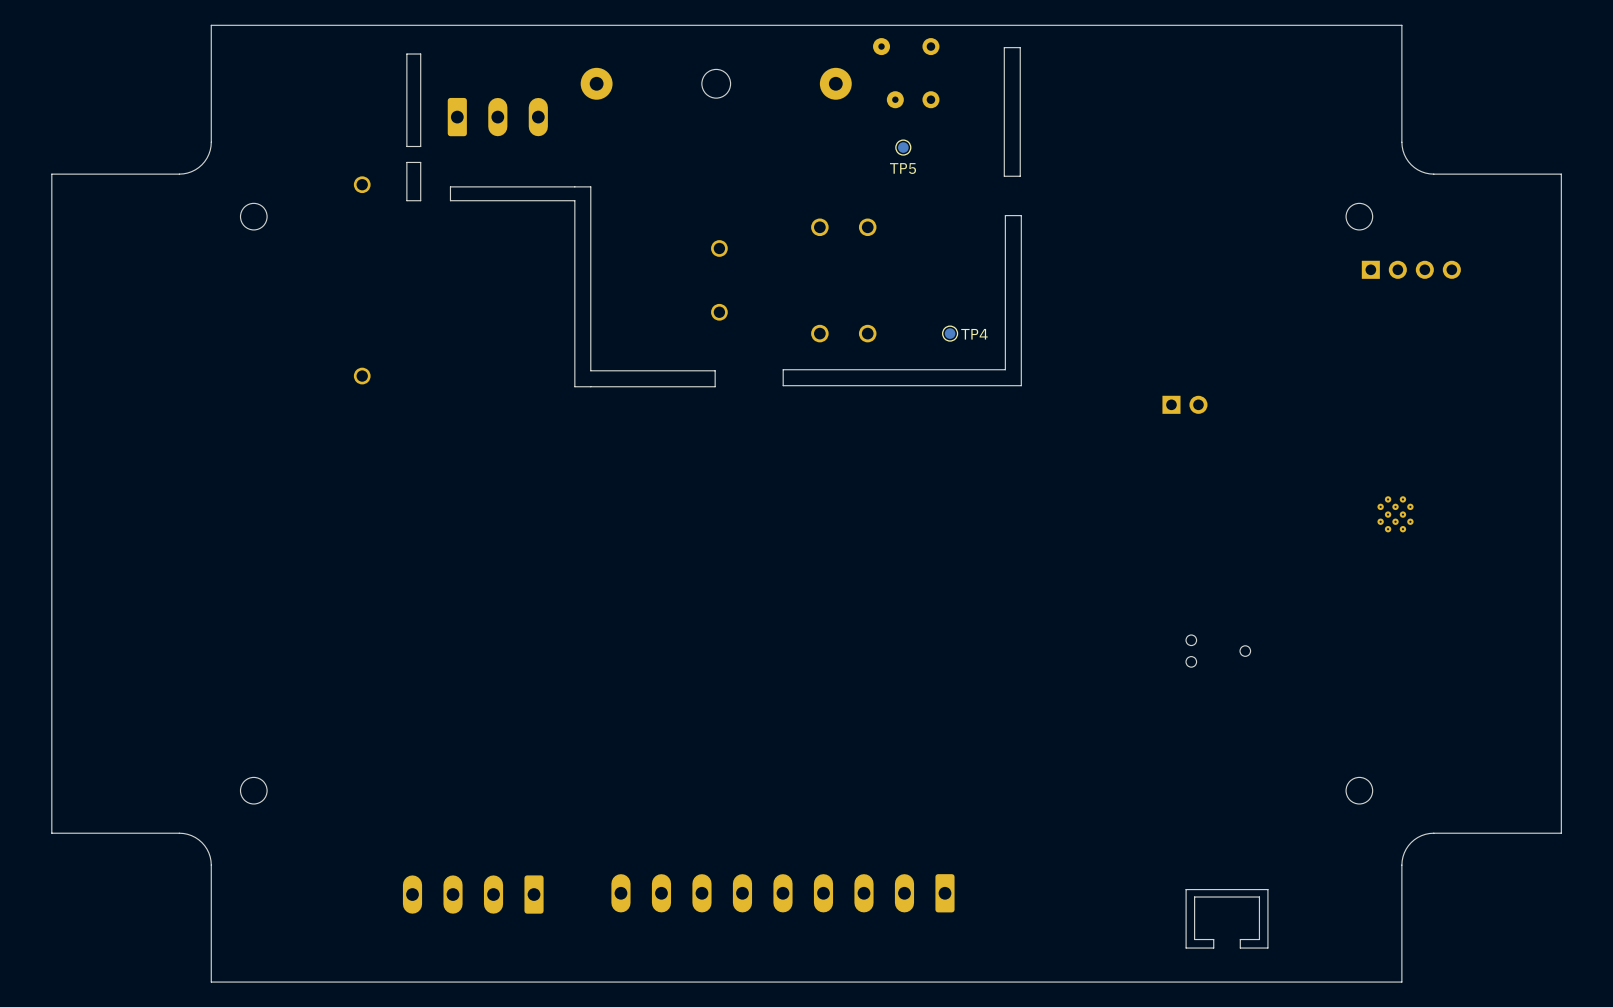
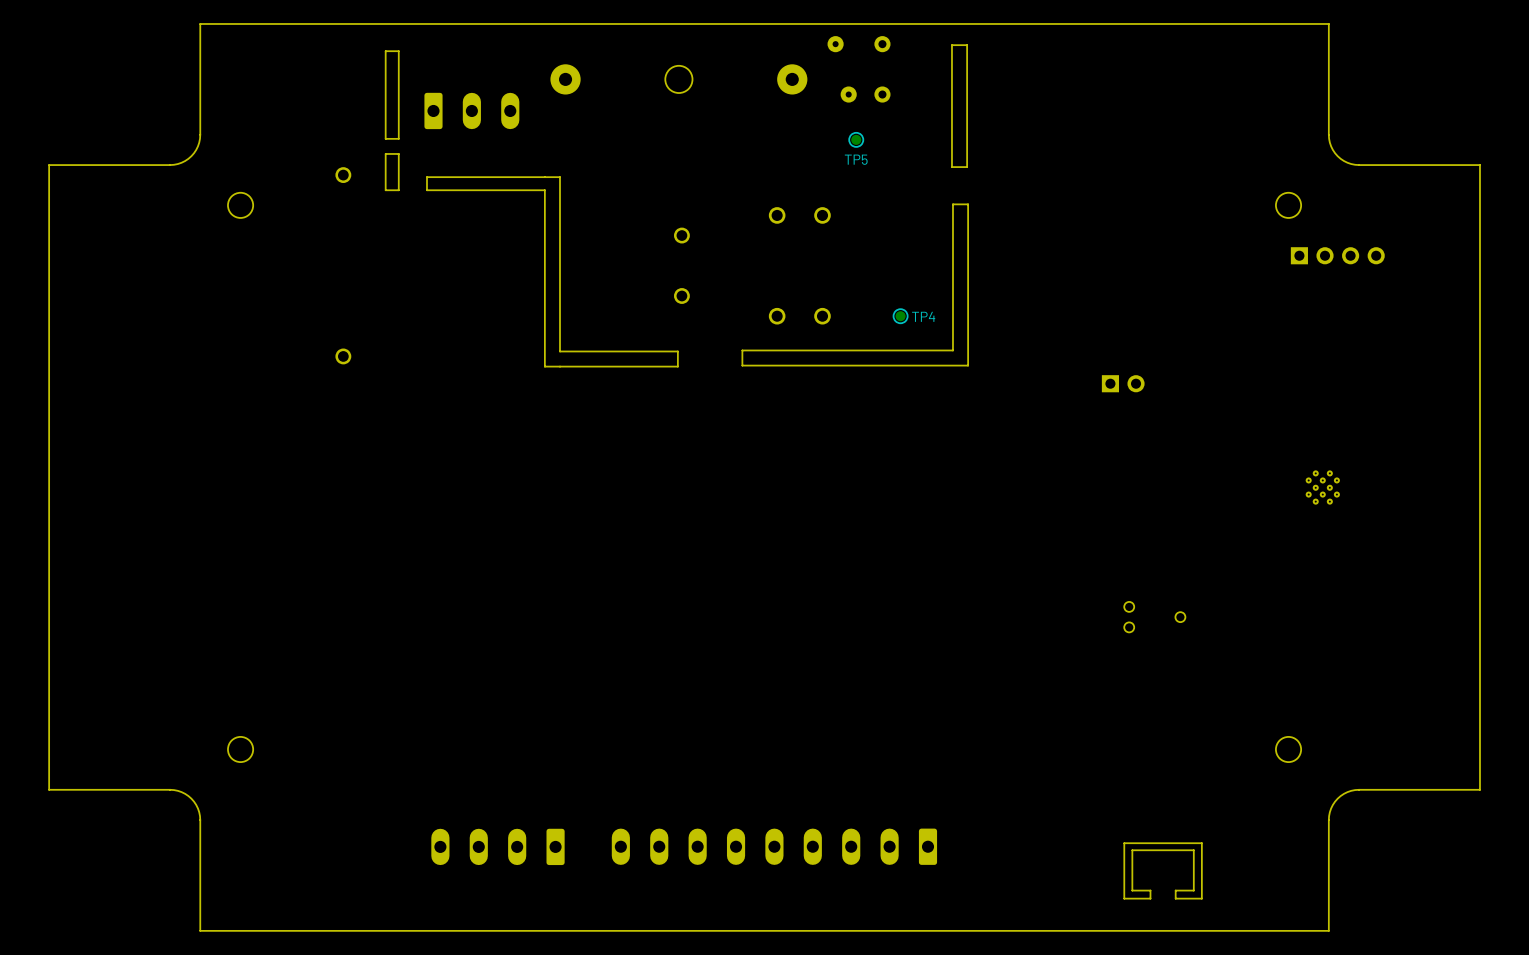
part: none -> (497, 846)
part position: (782, 893) -> (774, 846)
part: (473, 894) -> none

